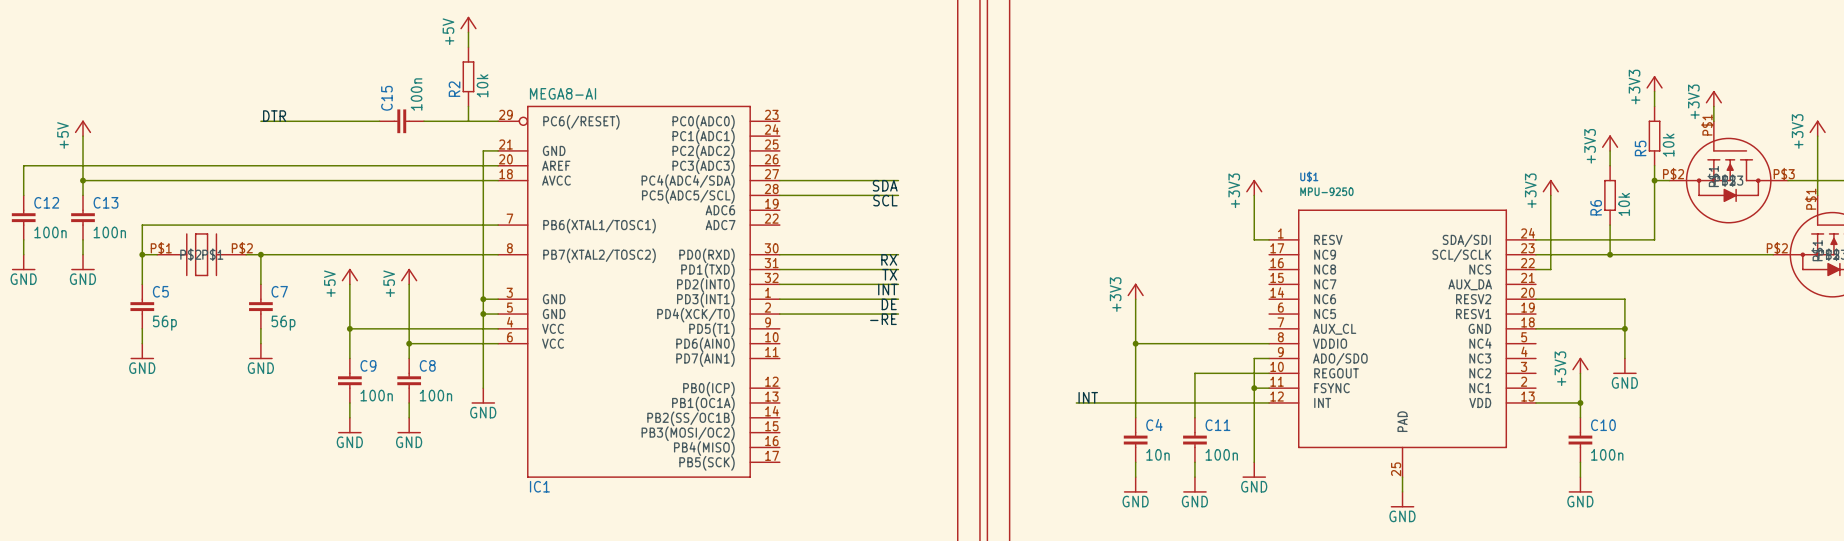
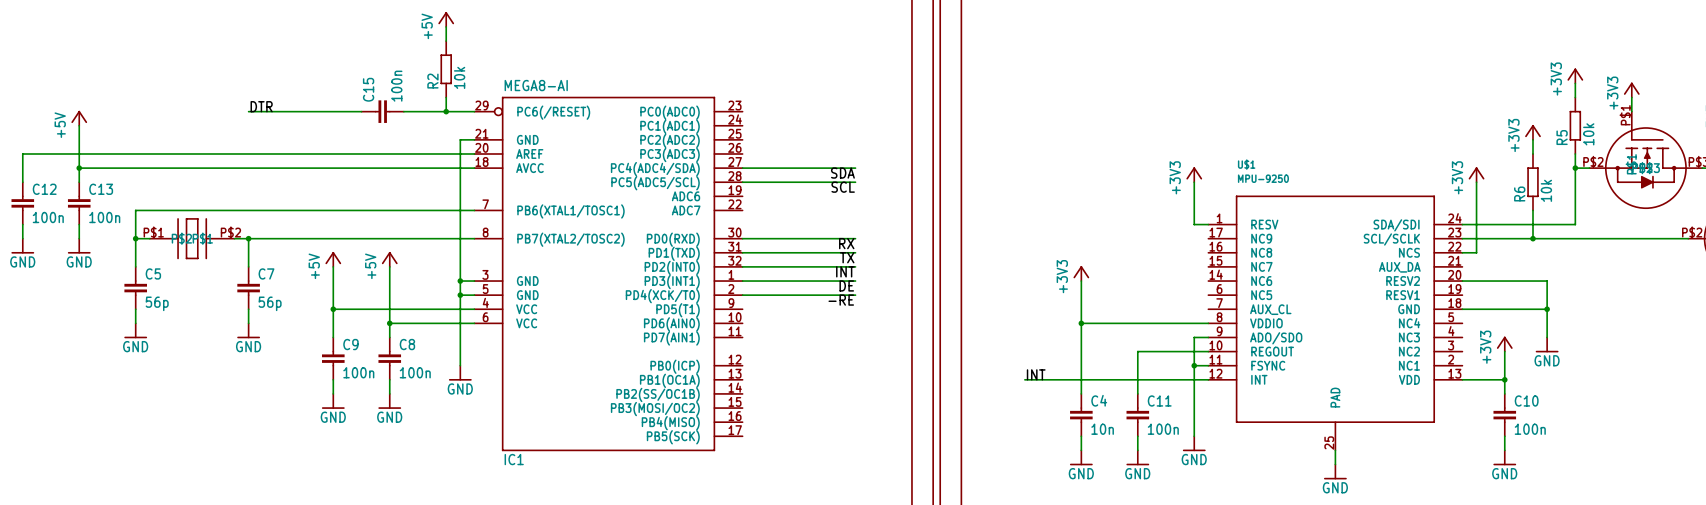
junction: none -> (446, 111)

